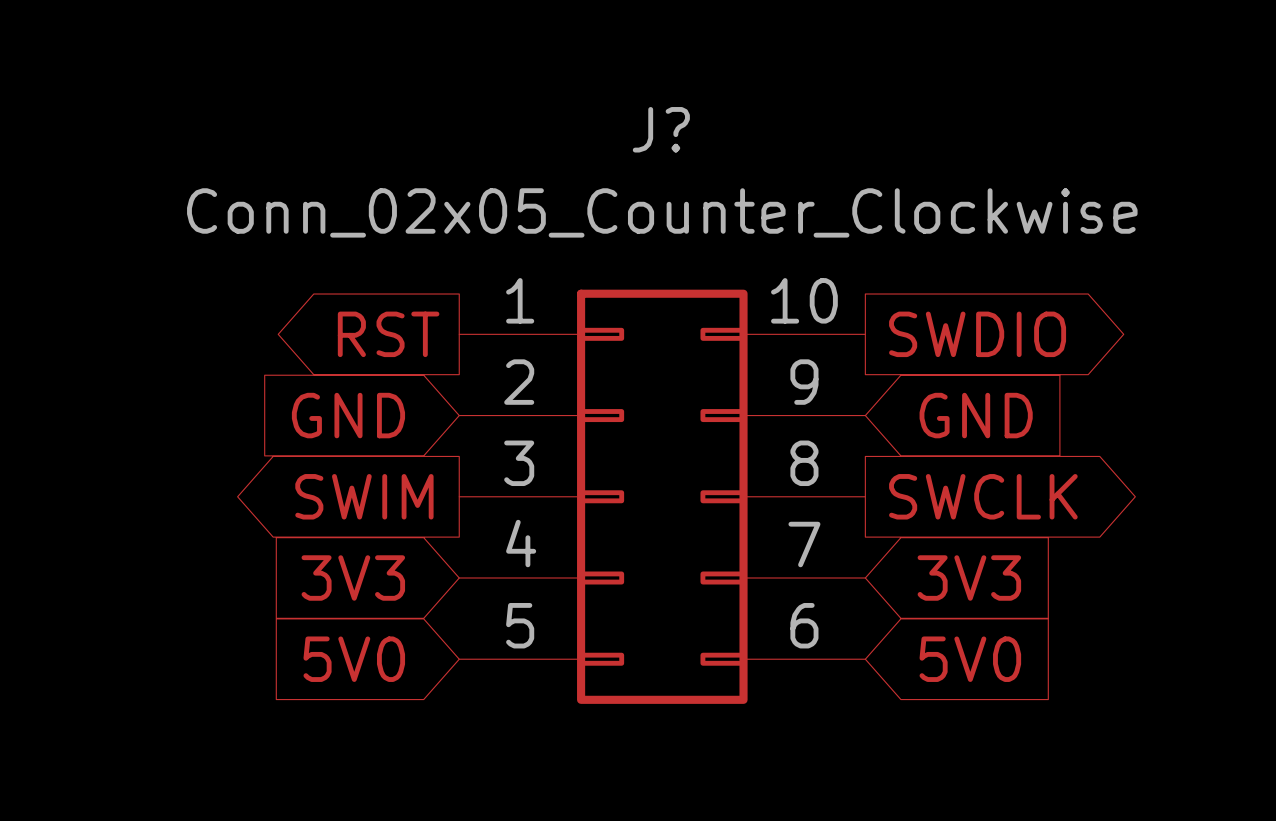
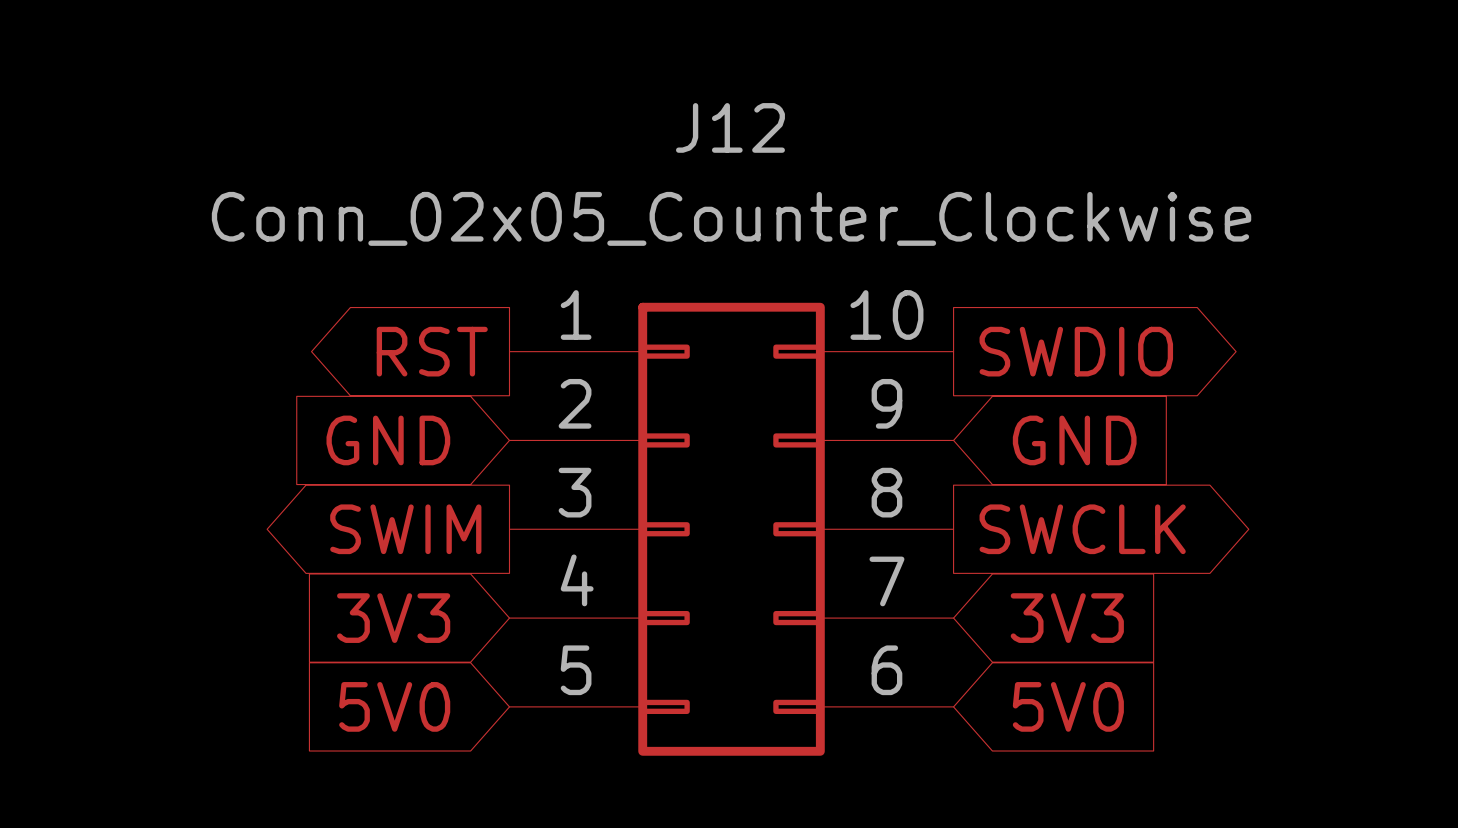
J? name: J? (661, 129) -> J12 (730, 127)

